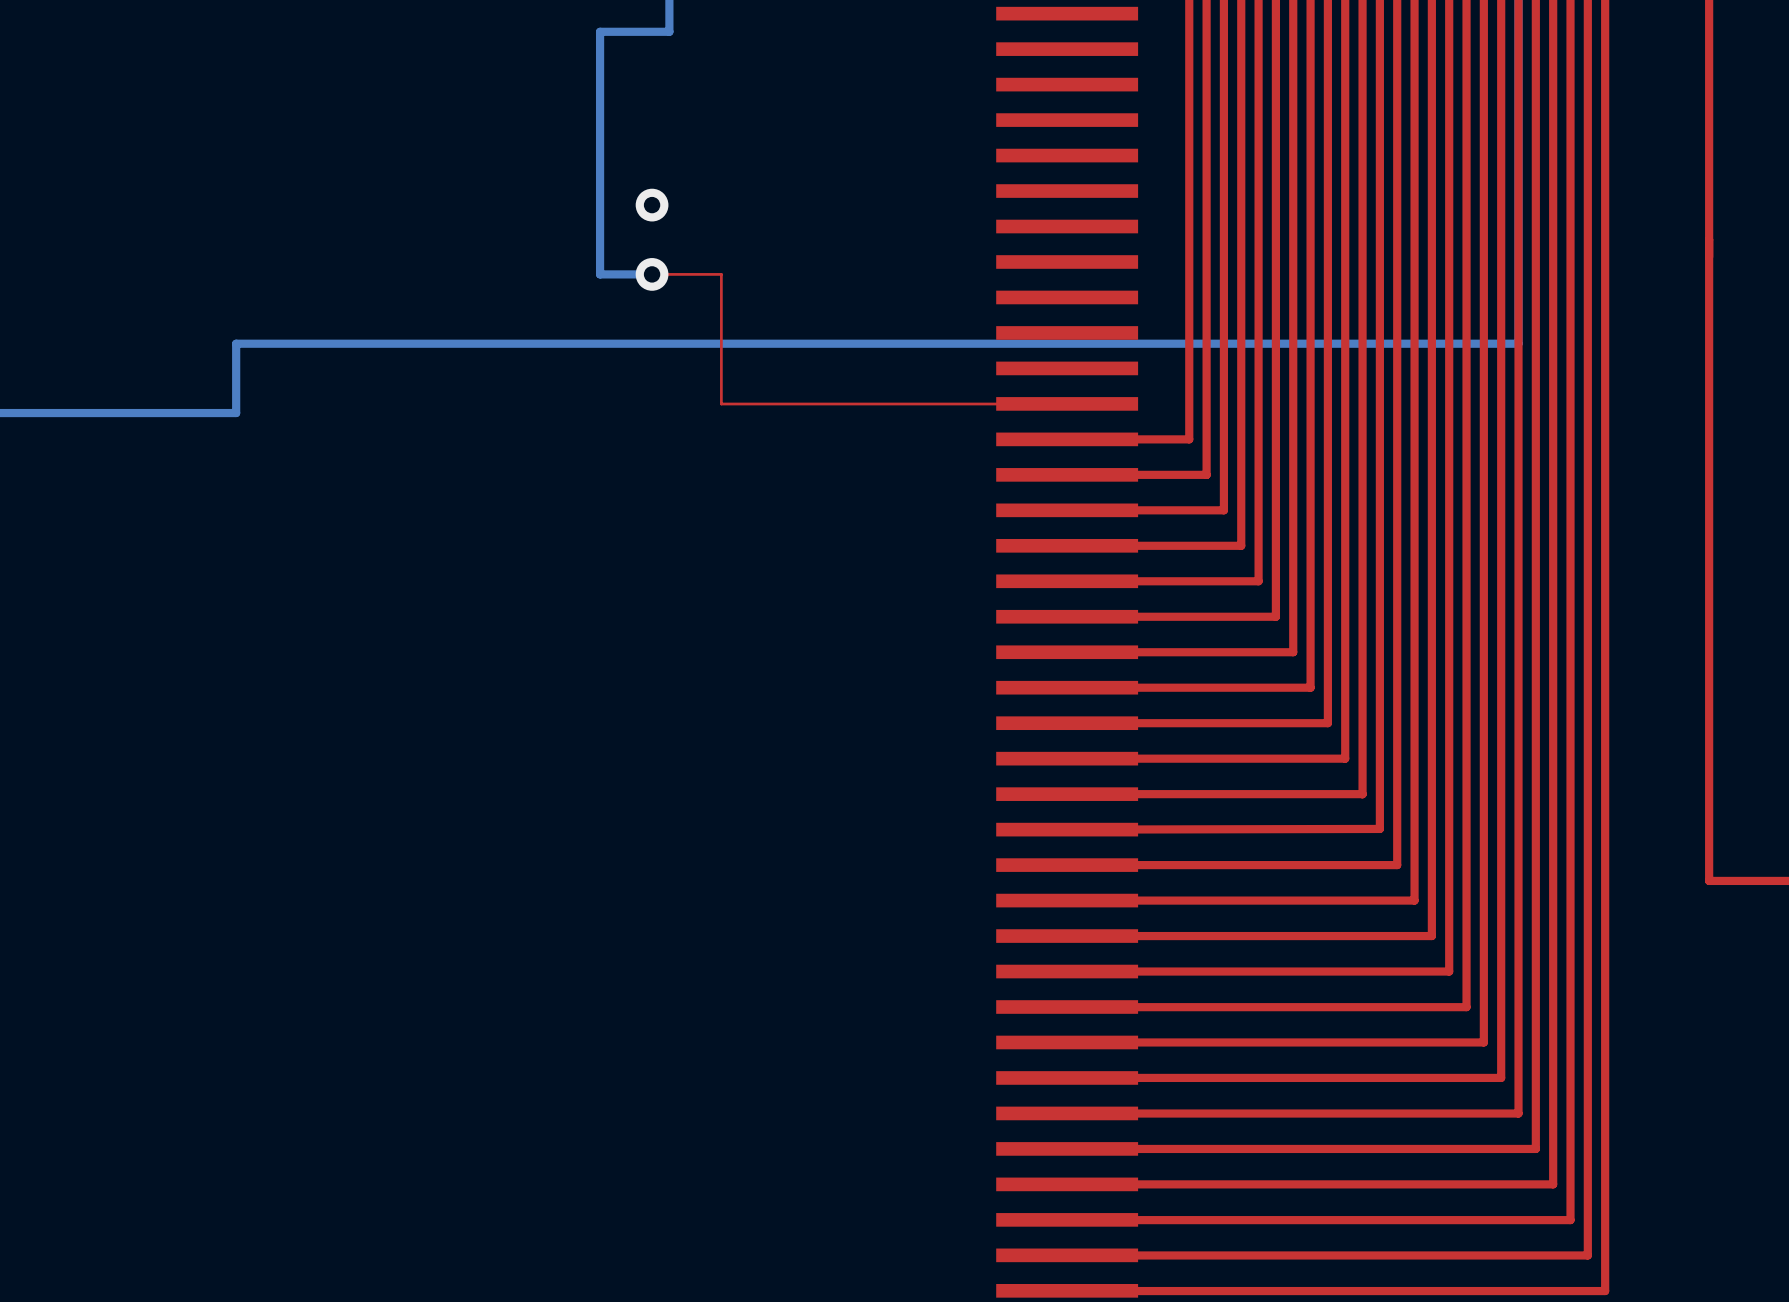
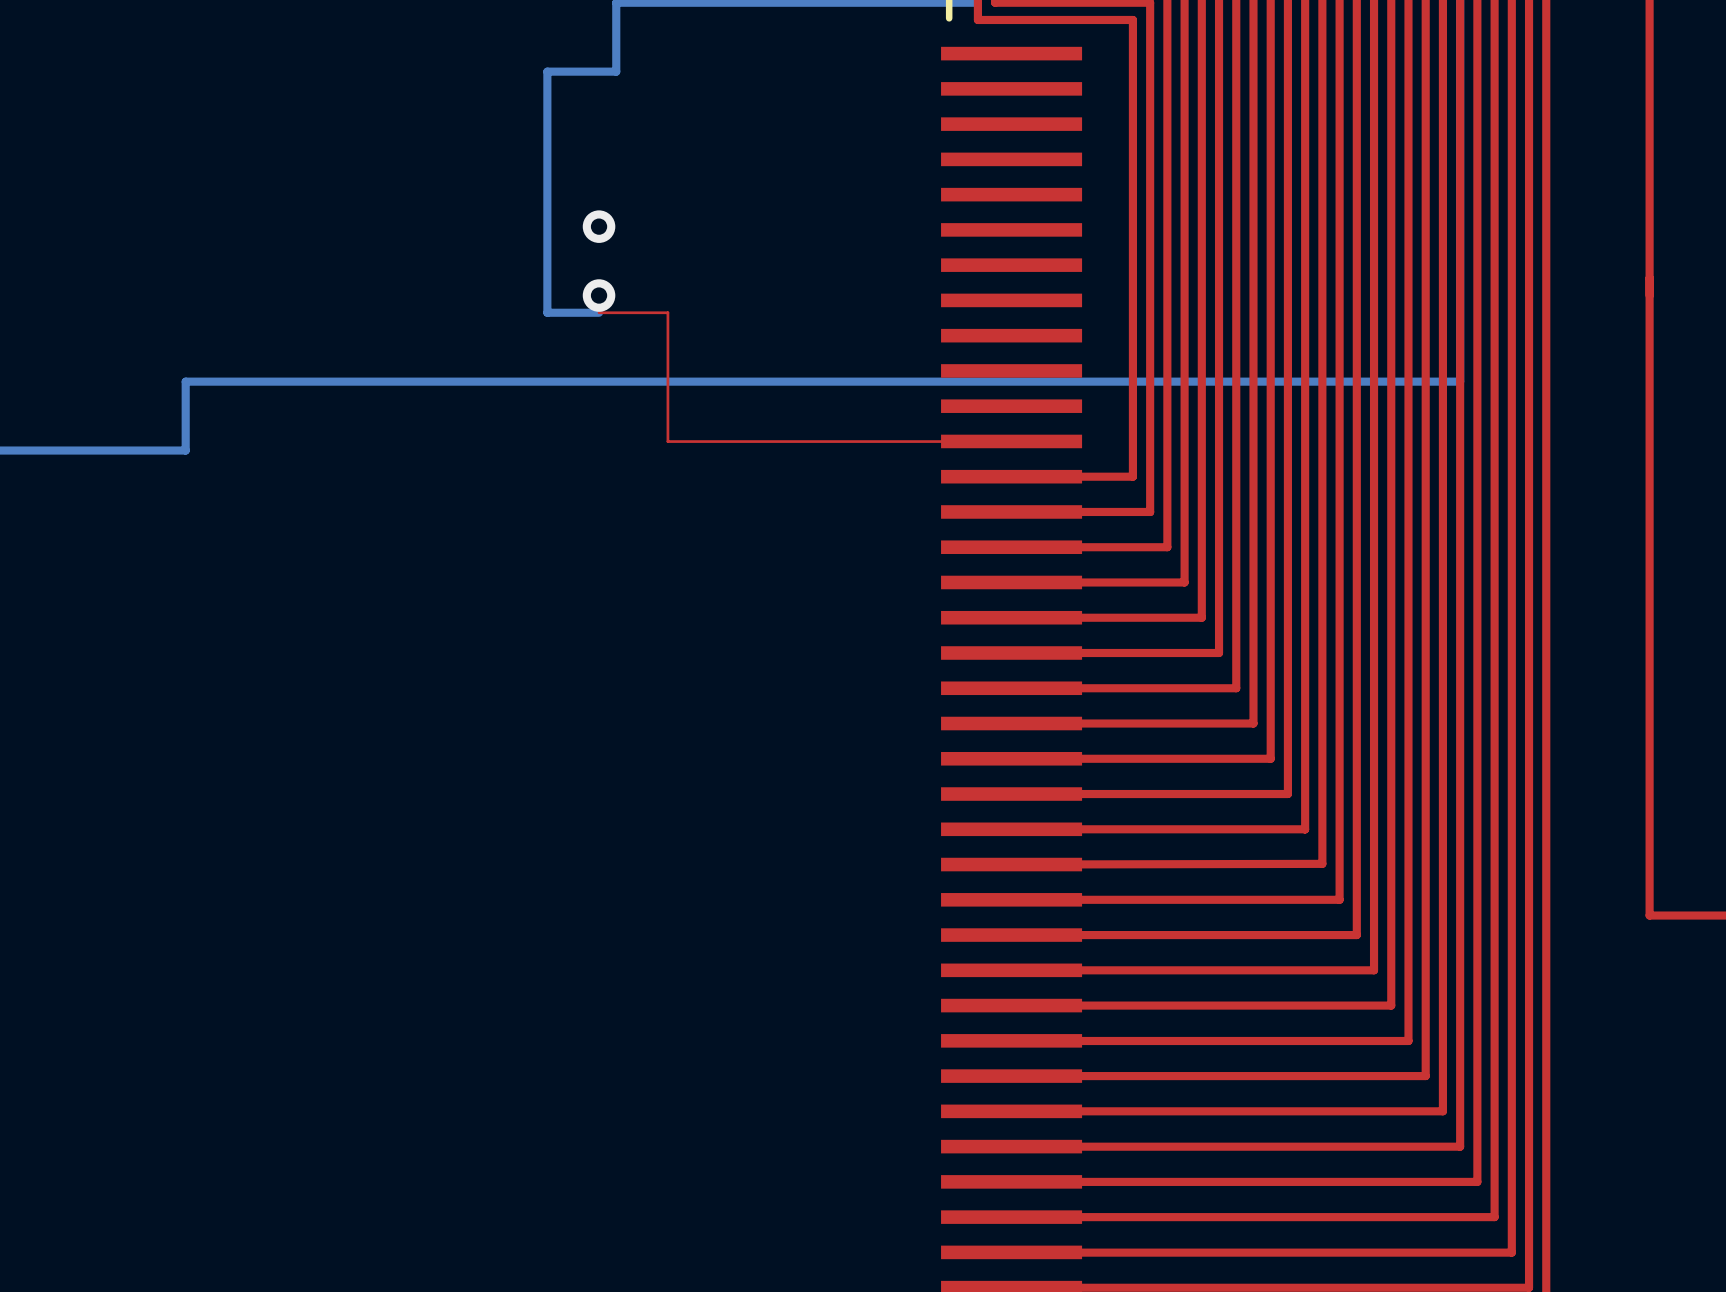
via position: (652, 205) -> (599, 226)
via position: (652, 274) -> (599, 295)

